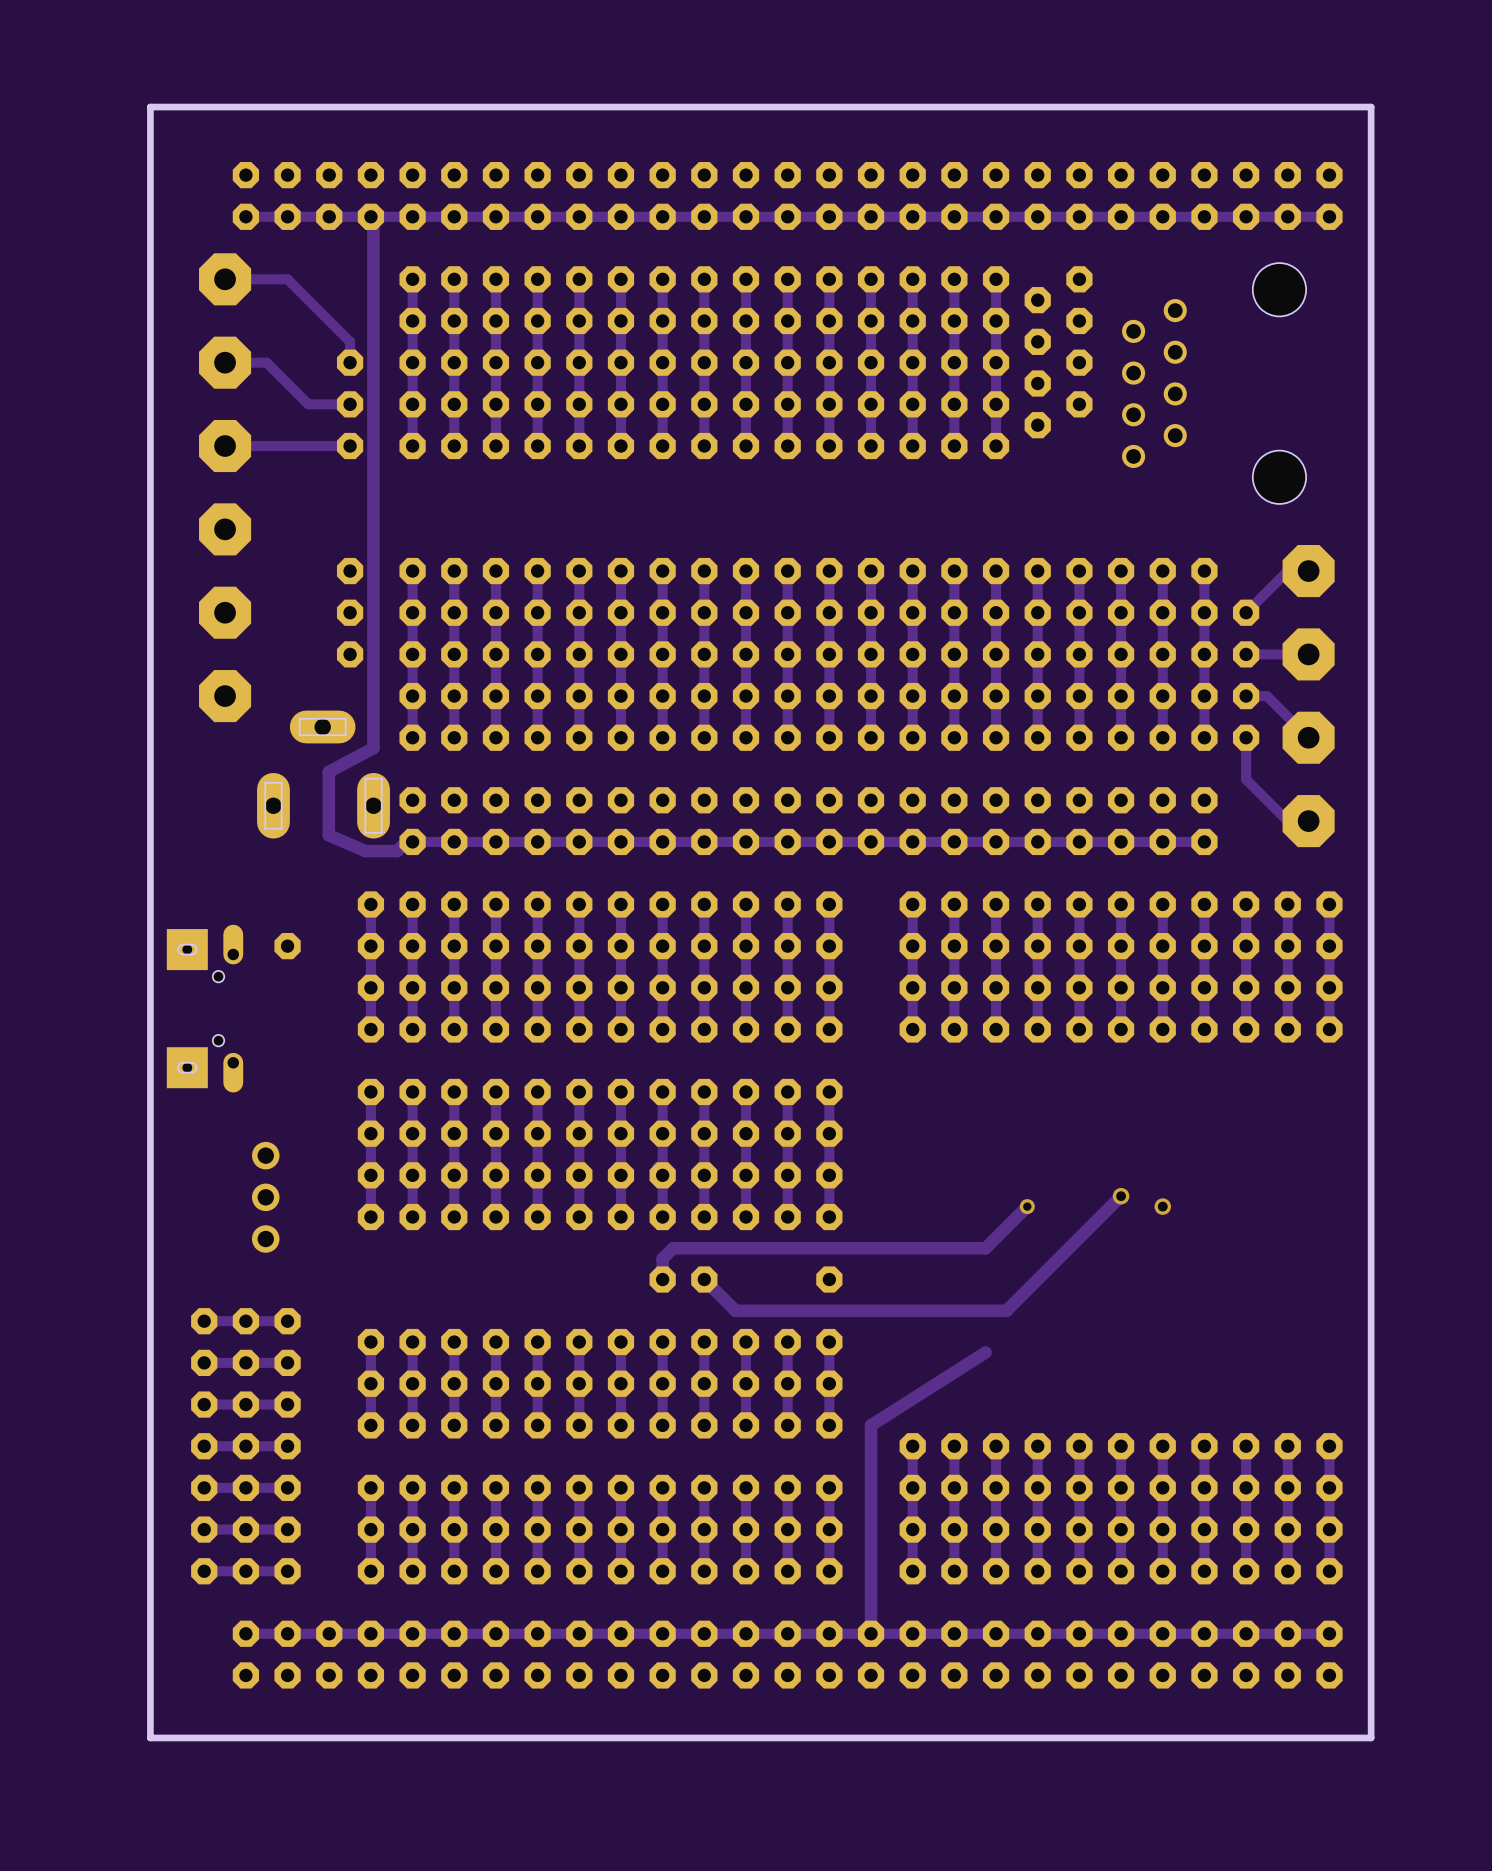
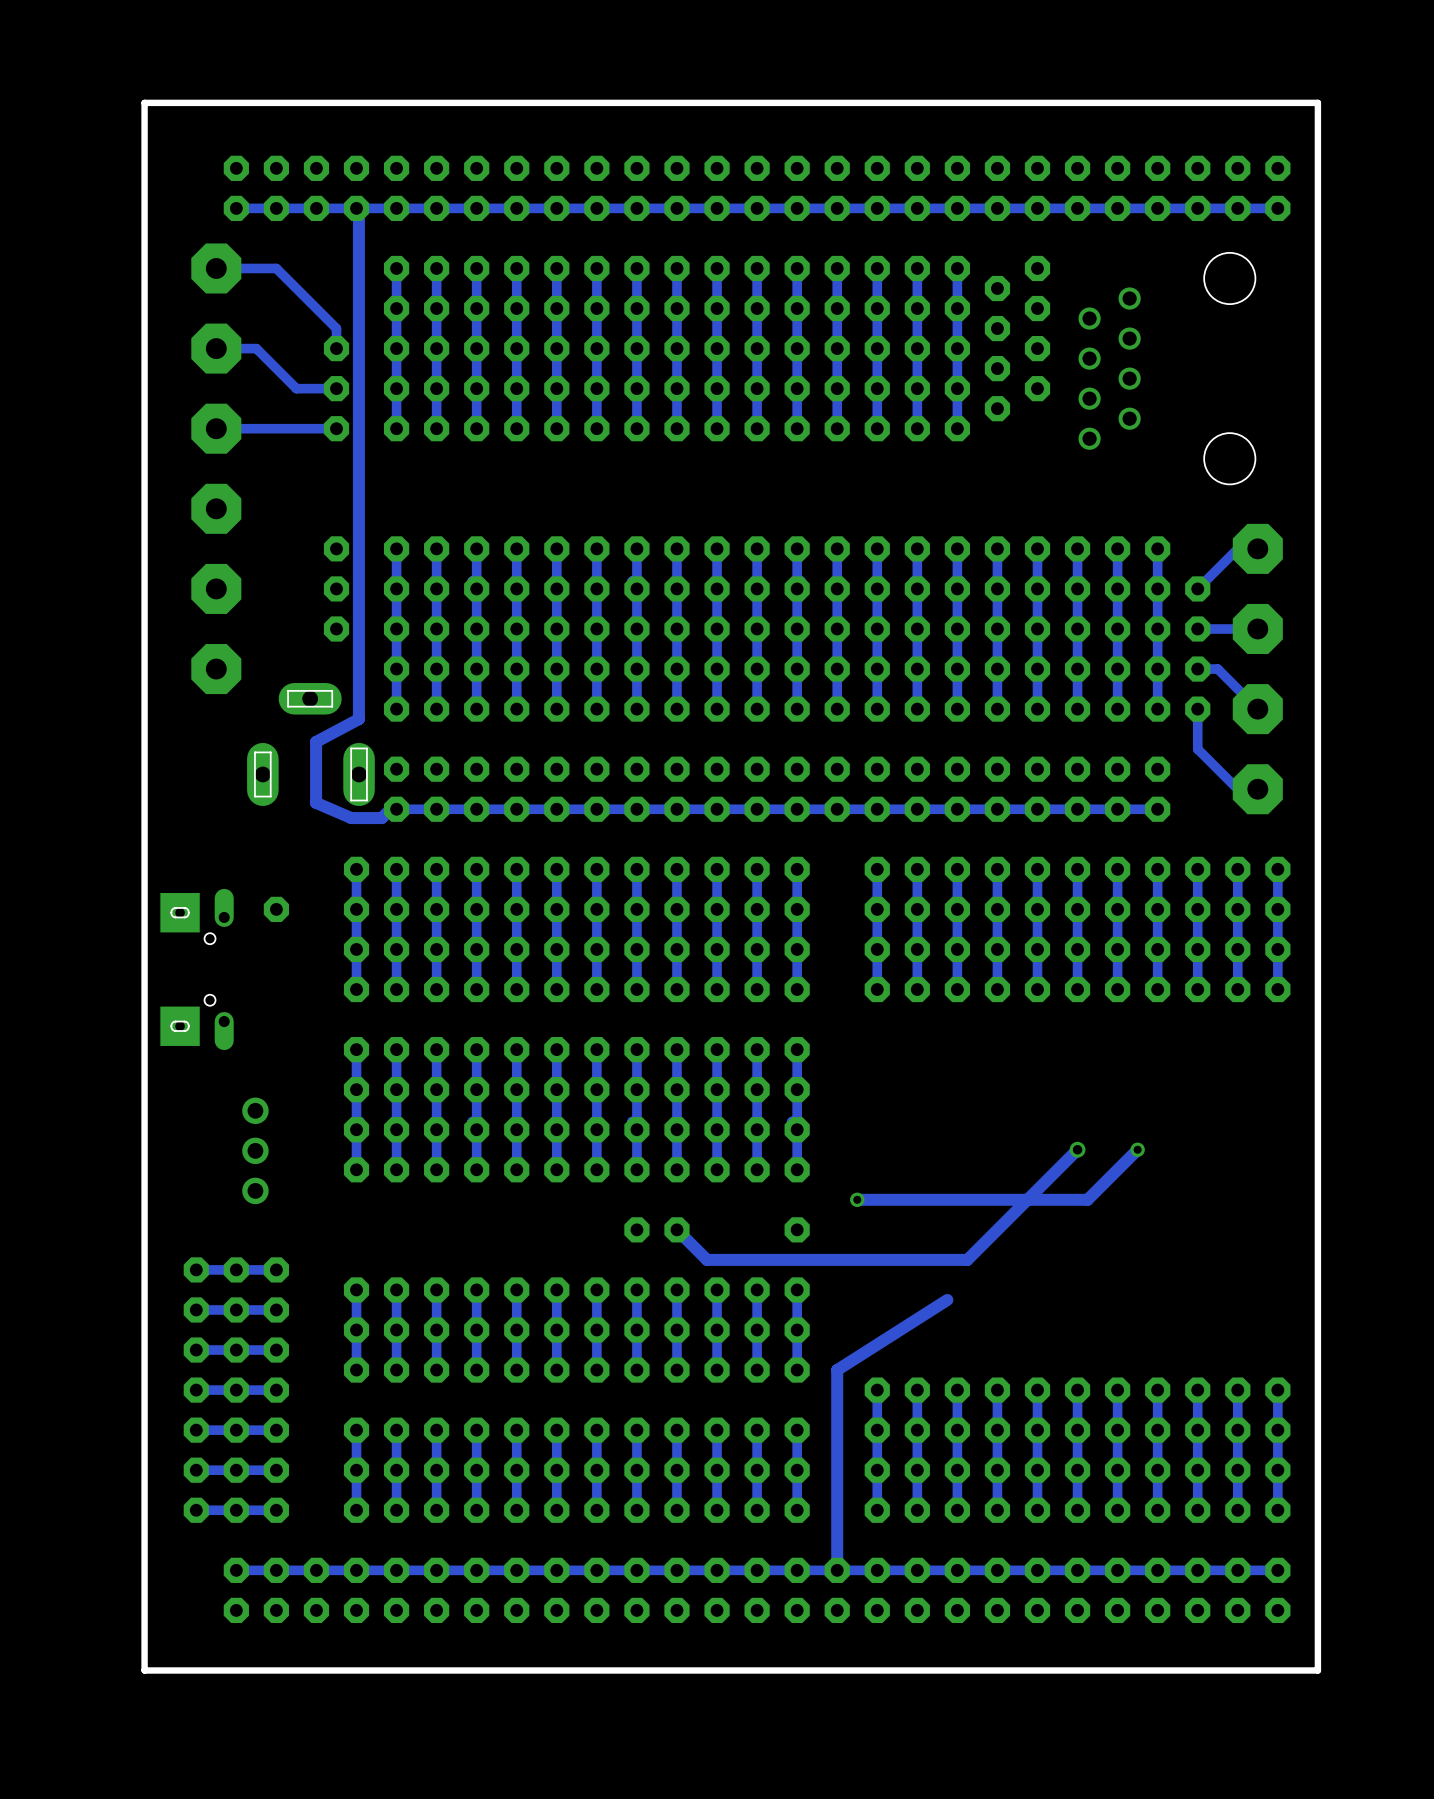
via: none -> (1137, 1149)
track: (1027, 1206) (985, 1248) -> (1137, 1149) (1087, 1199) (947, 1199)
via: (1027, 1206) -> none
via: (1162, 1206) -> none
track: (891, 1248) (673, 1248) (662, 1258) (662, 1279) -> none
via: none -> (857, 1199)

